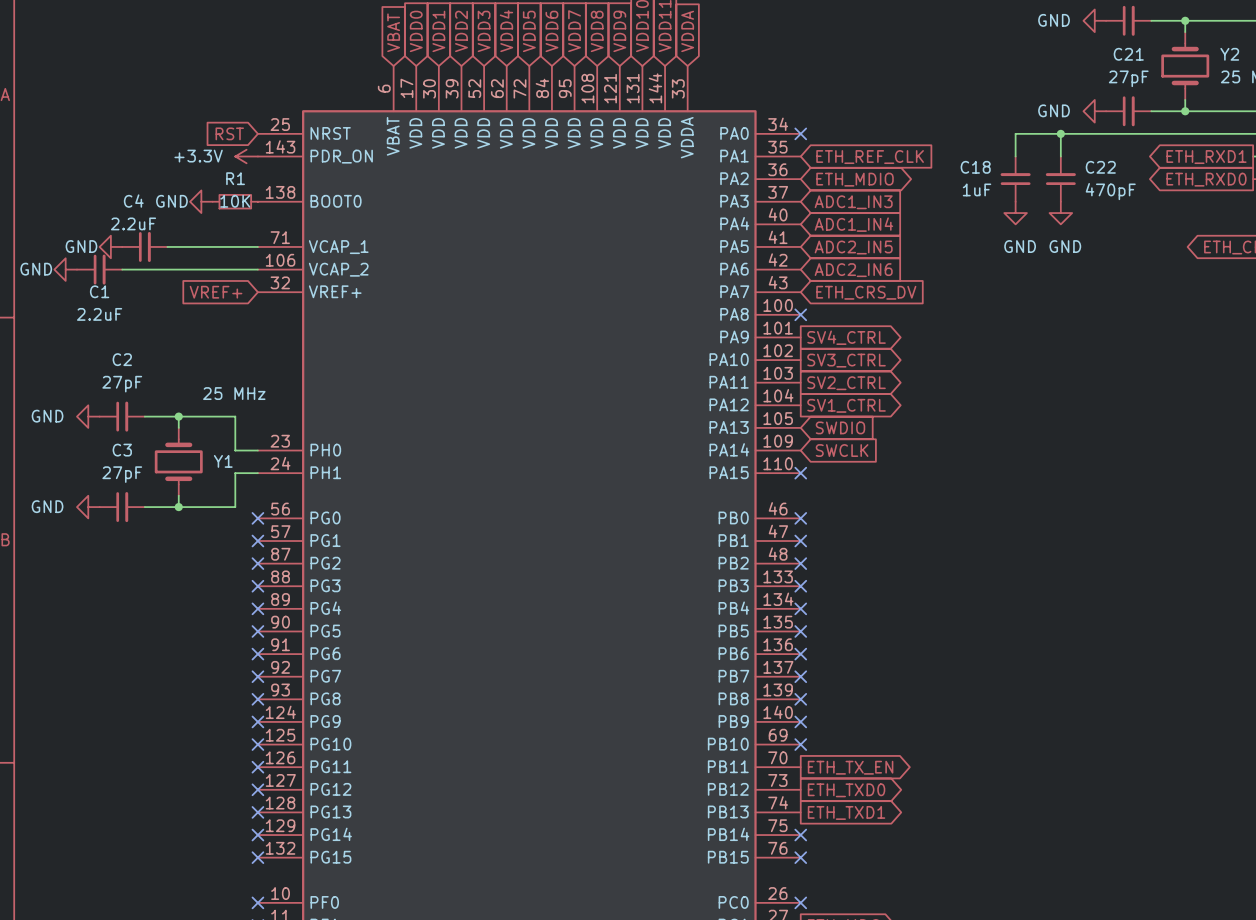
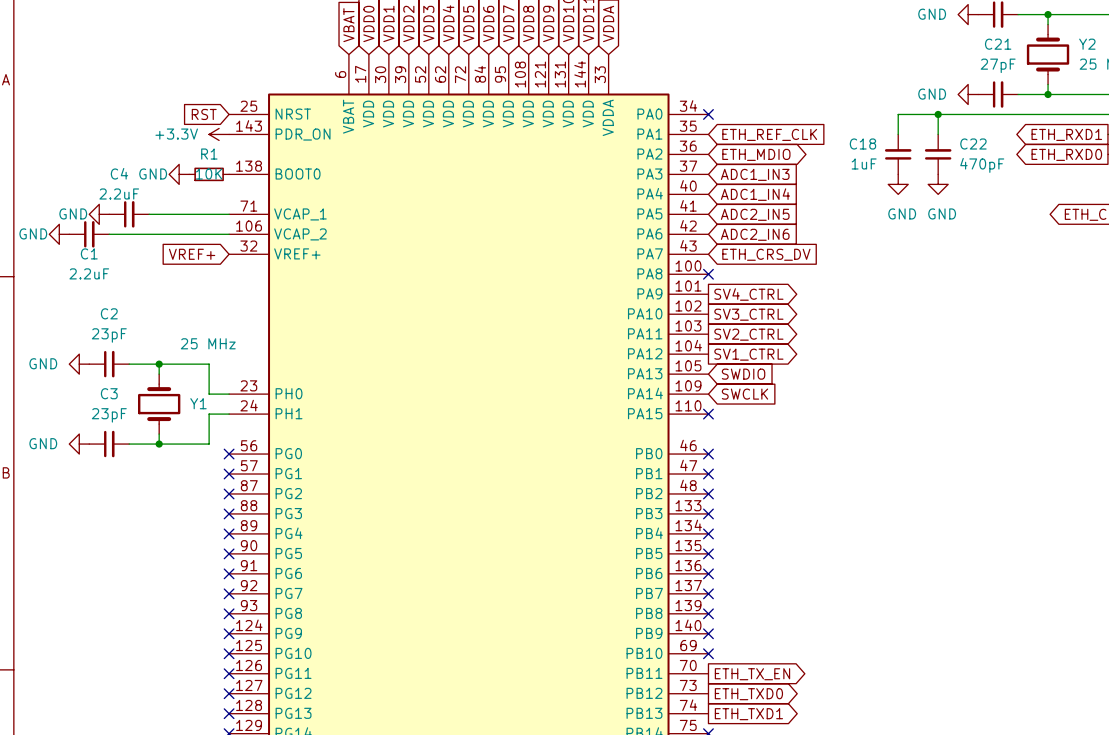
C2 value: 27pF (122, 384) -> 23pF (109, 335)
C3 value: 27pF (122, 474) -> 23pF (109, 415)

